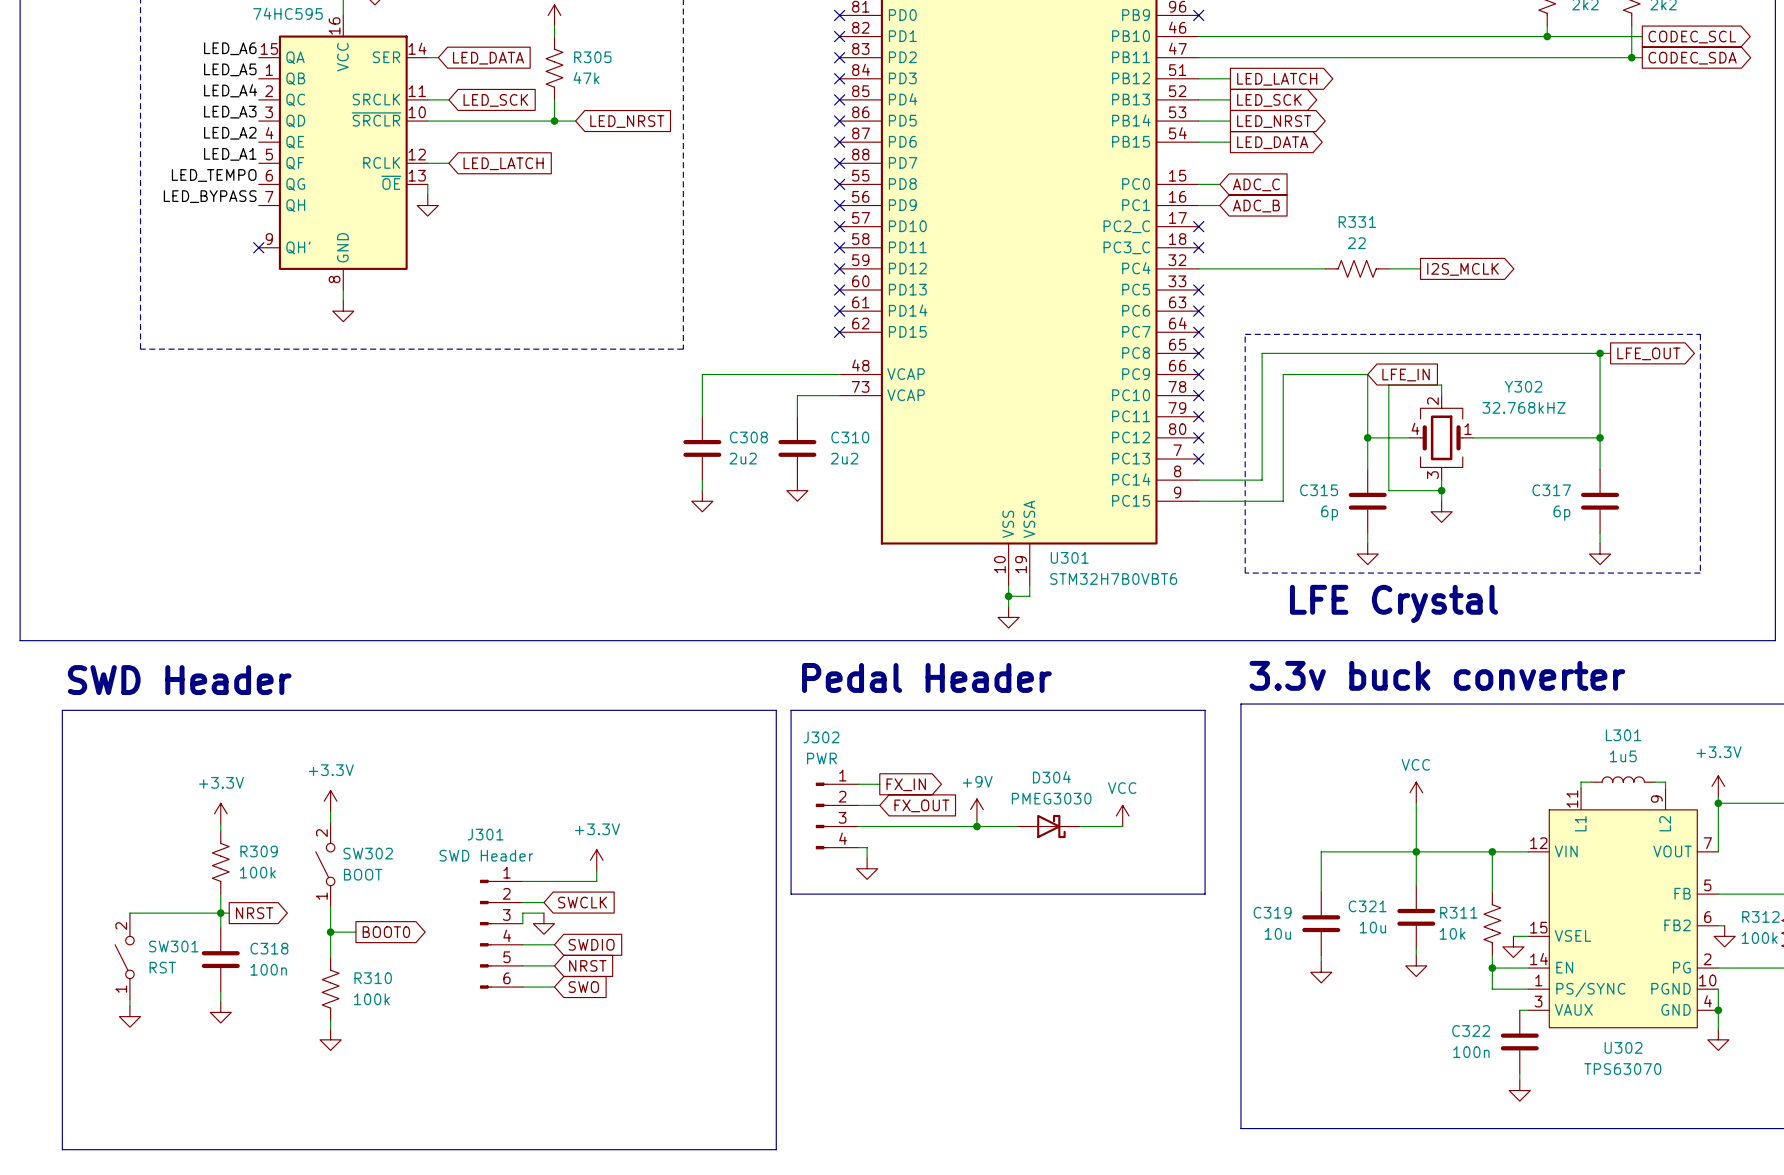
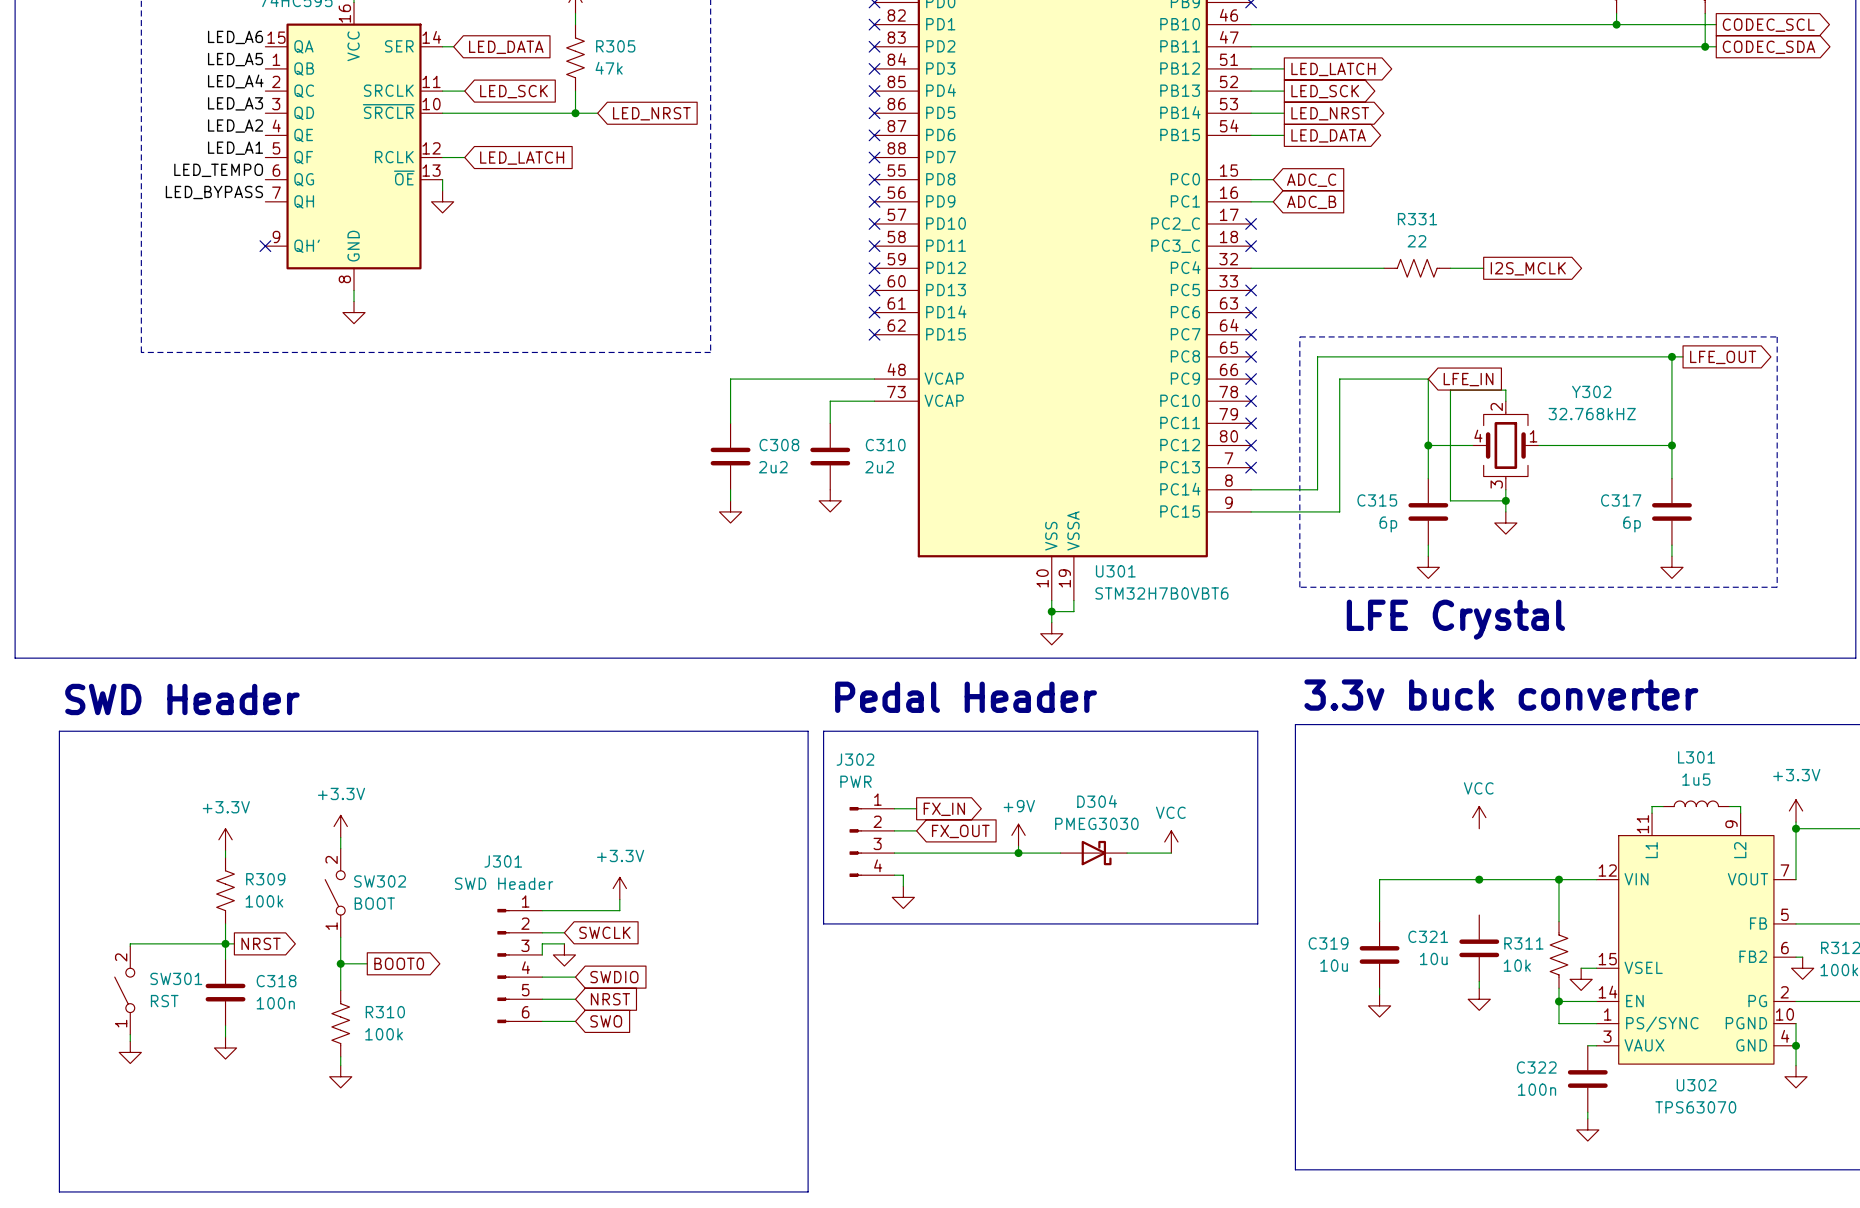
wire: (1416, 803) (1416, 885) -> none

